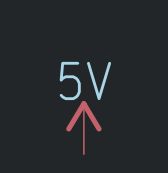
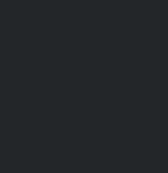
power symbol: 5V (83, 127) -> none

